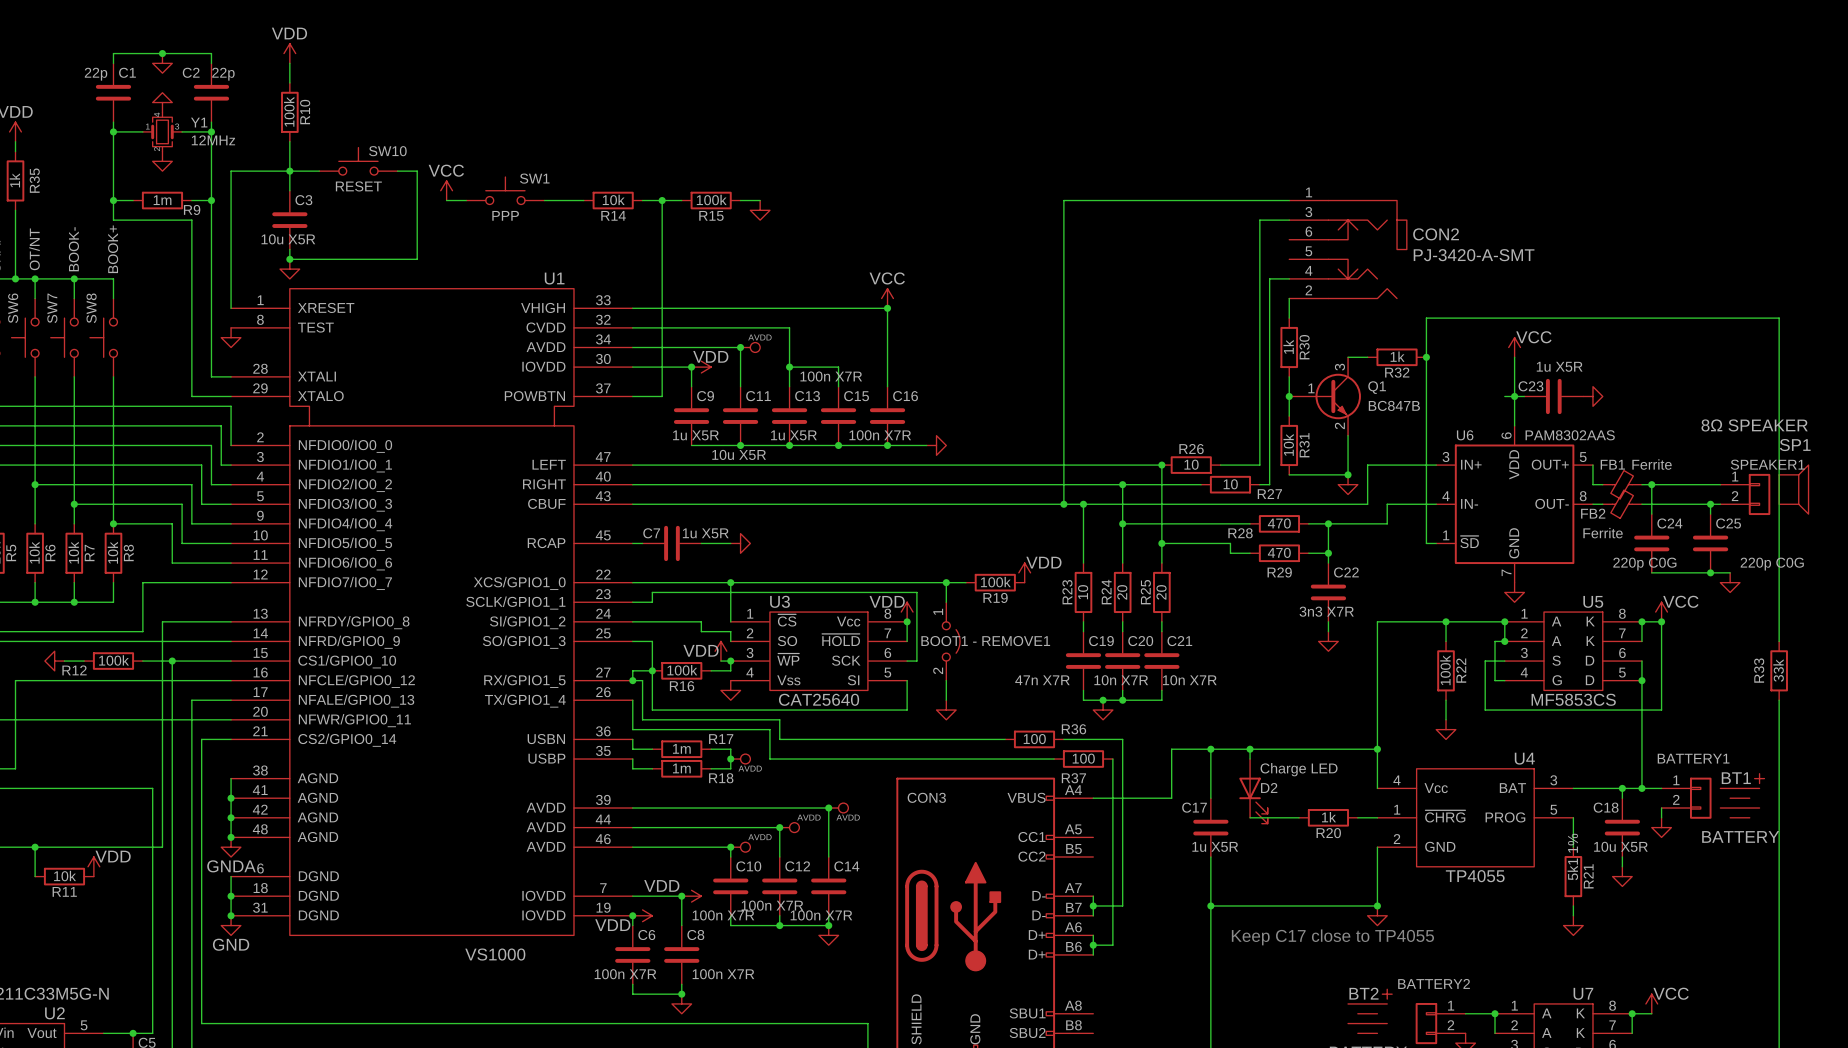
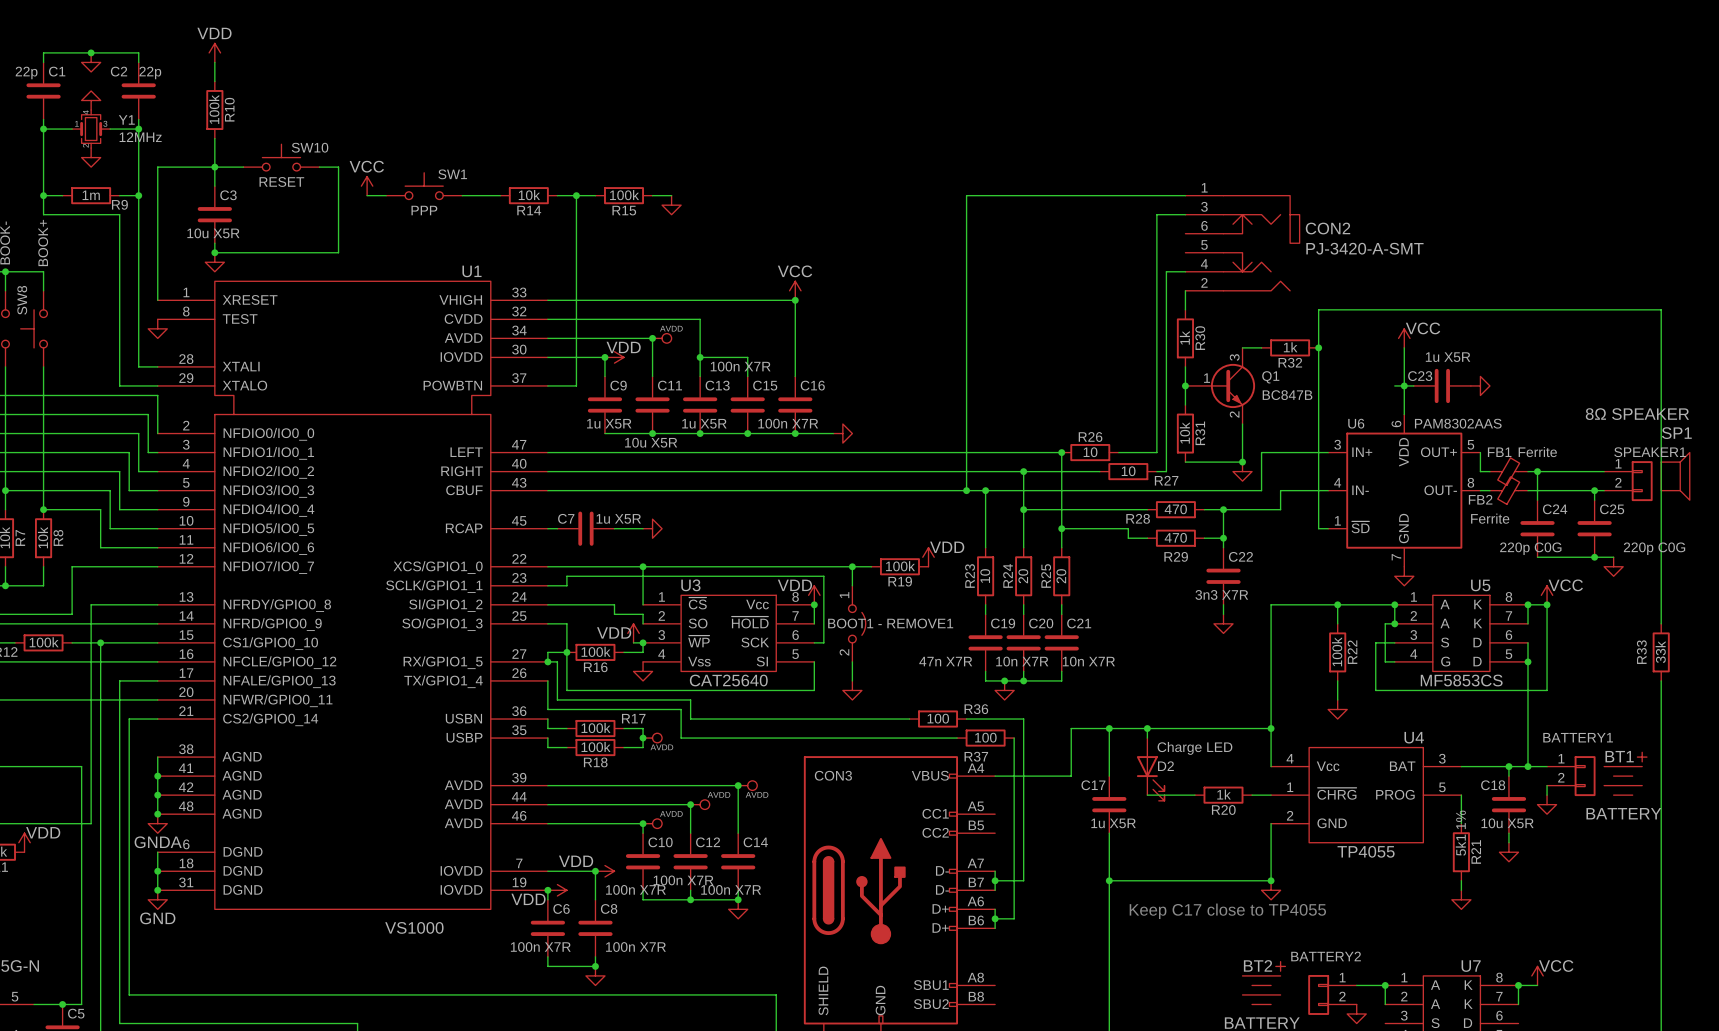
R17 value: 1m (681, 748) -> 100k (596, 727)
R18 value: 1m (681, 768) -> 100k (596, 747)
R18 name position: R18 (721, 778) -> R18 (595, 762)

